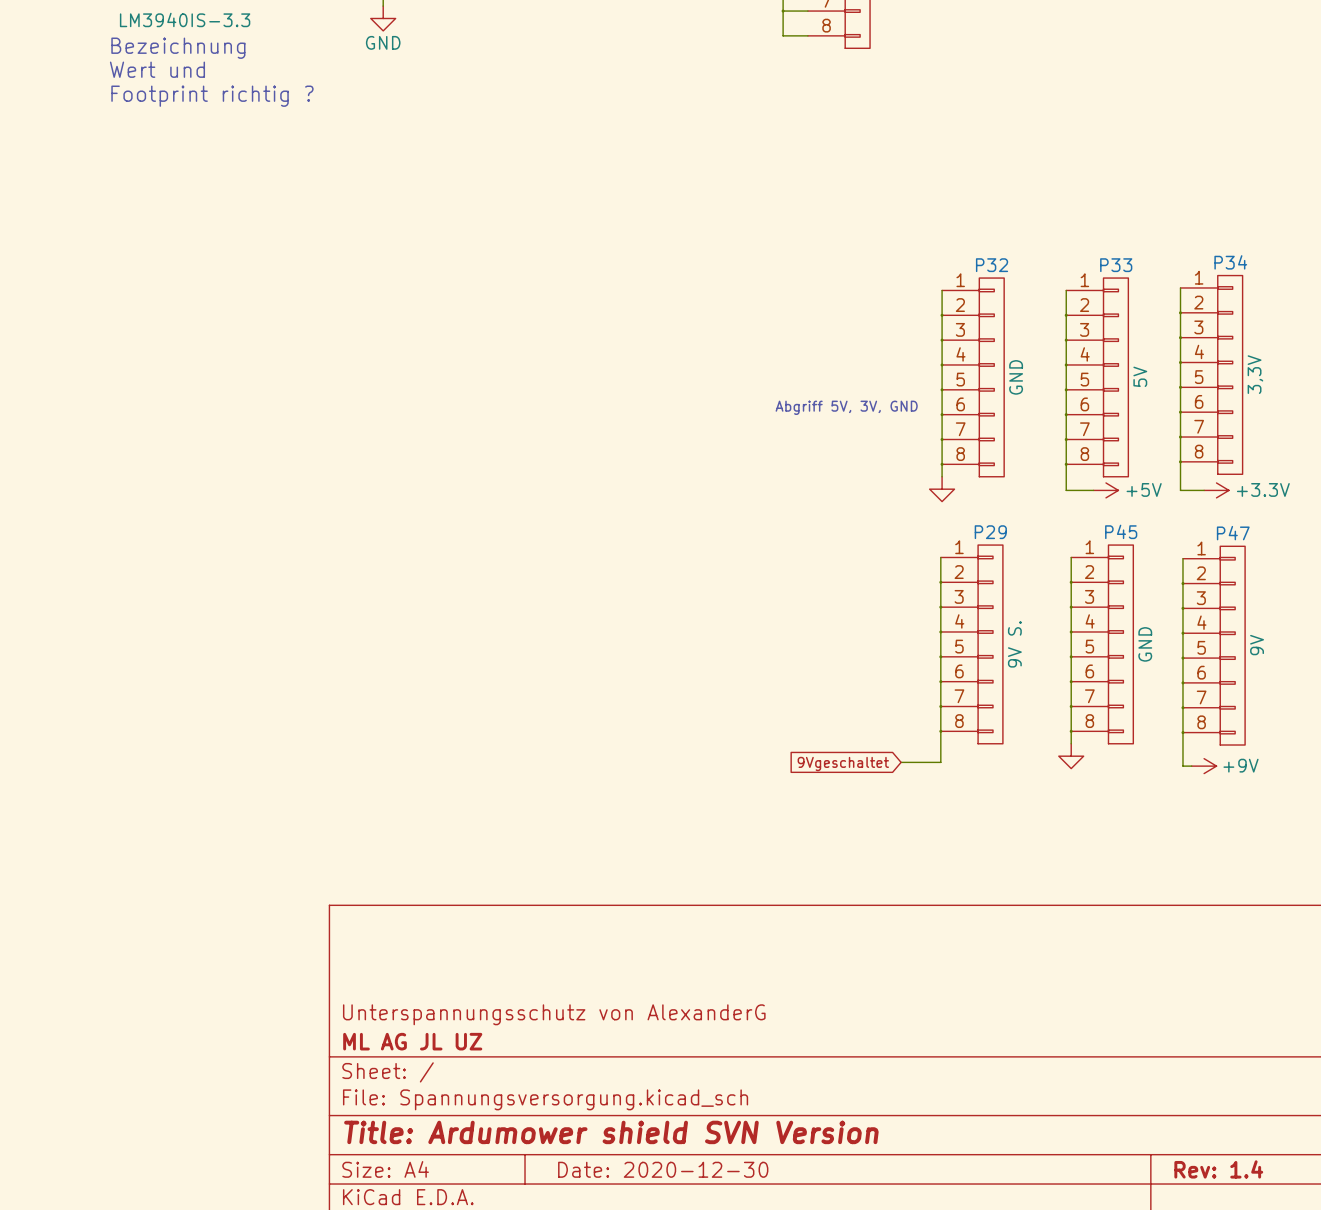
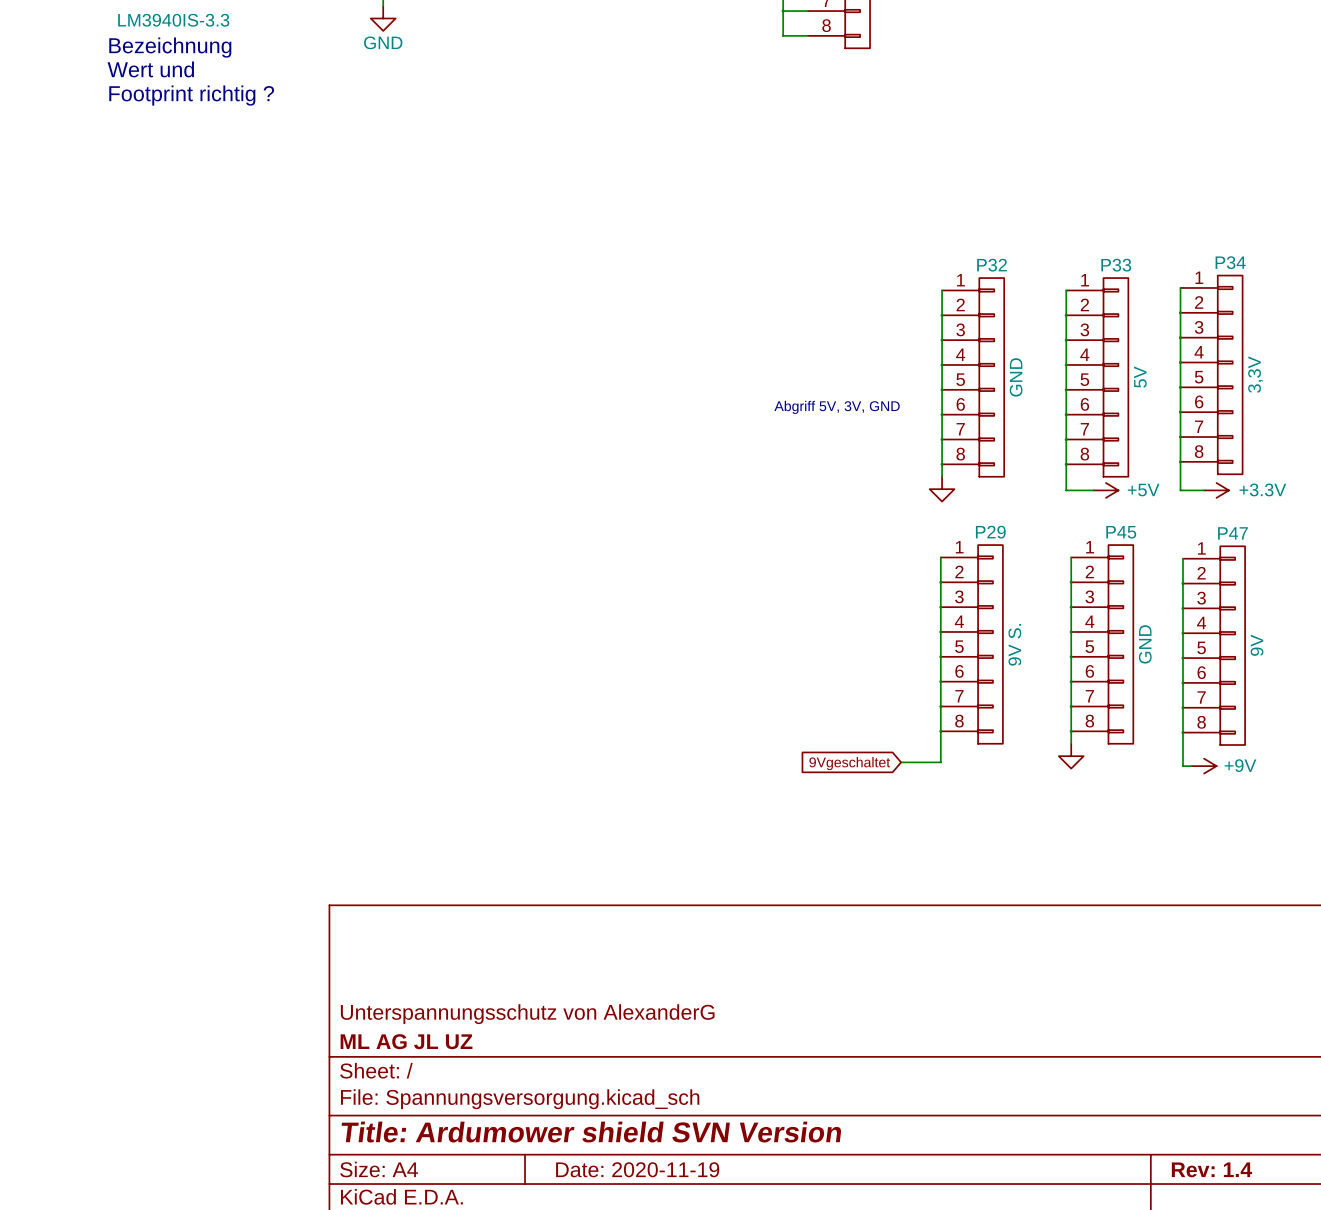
title block: Date: 2020-12-30 (663, 1169) -> Date: 2020-11-19 (637, 1169)

